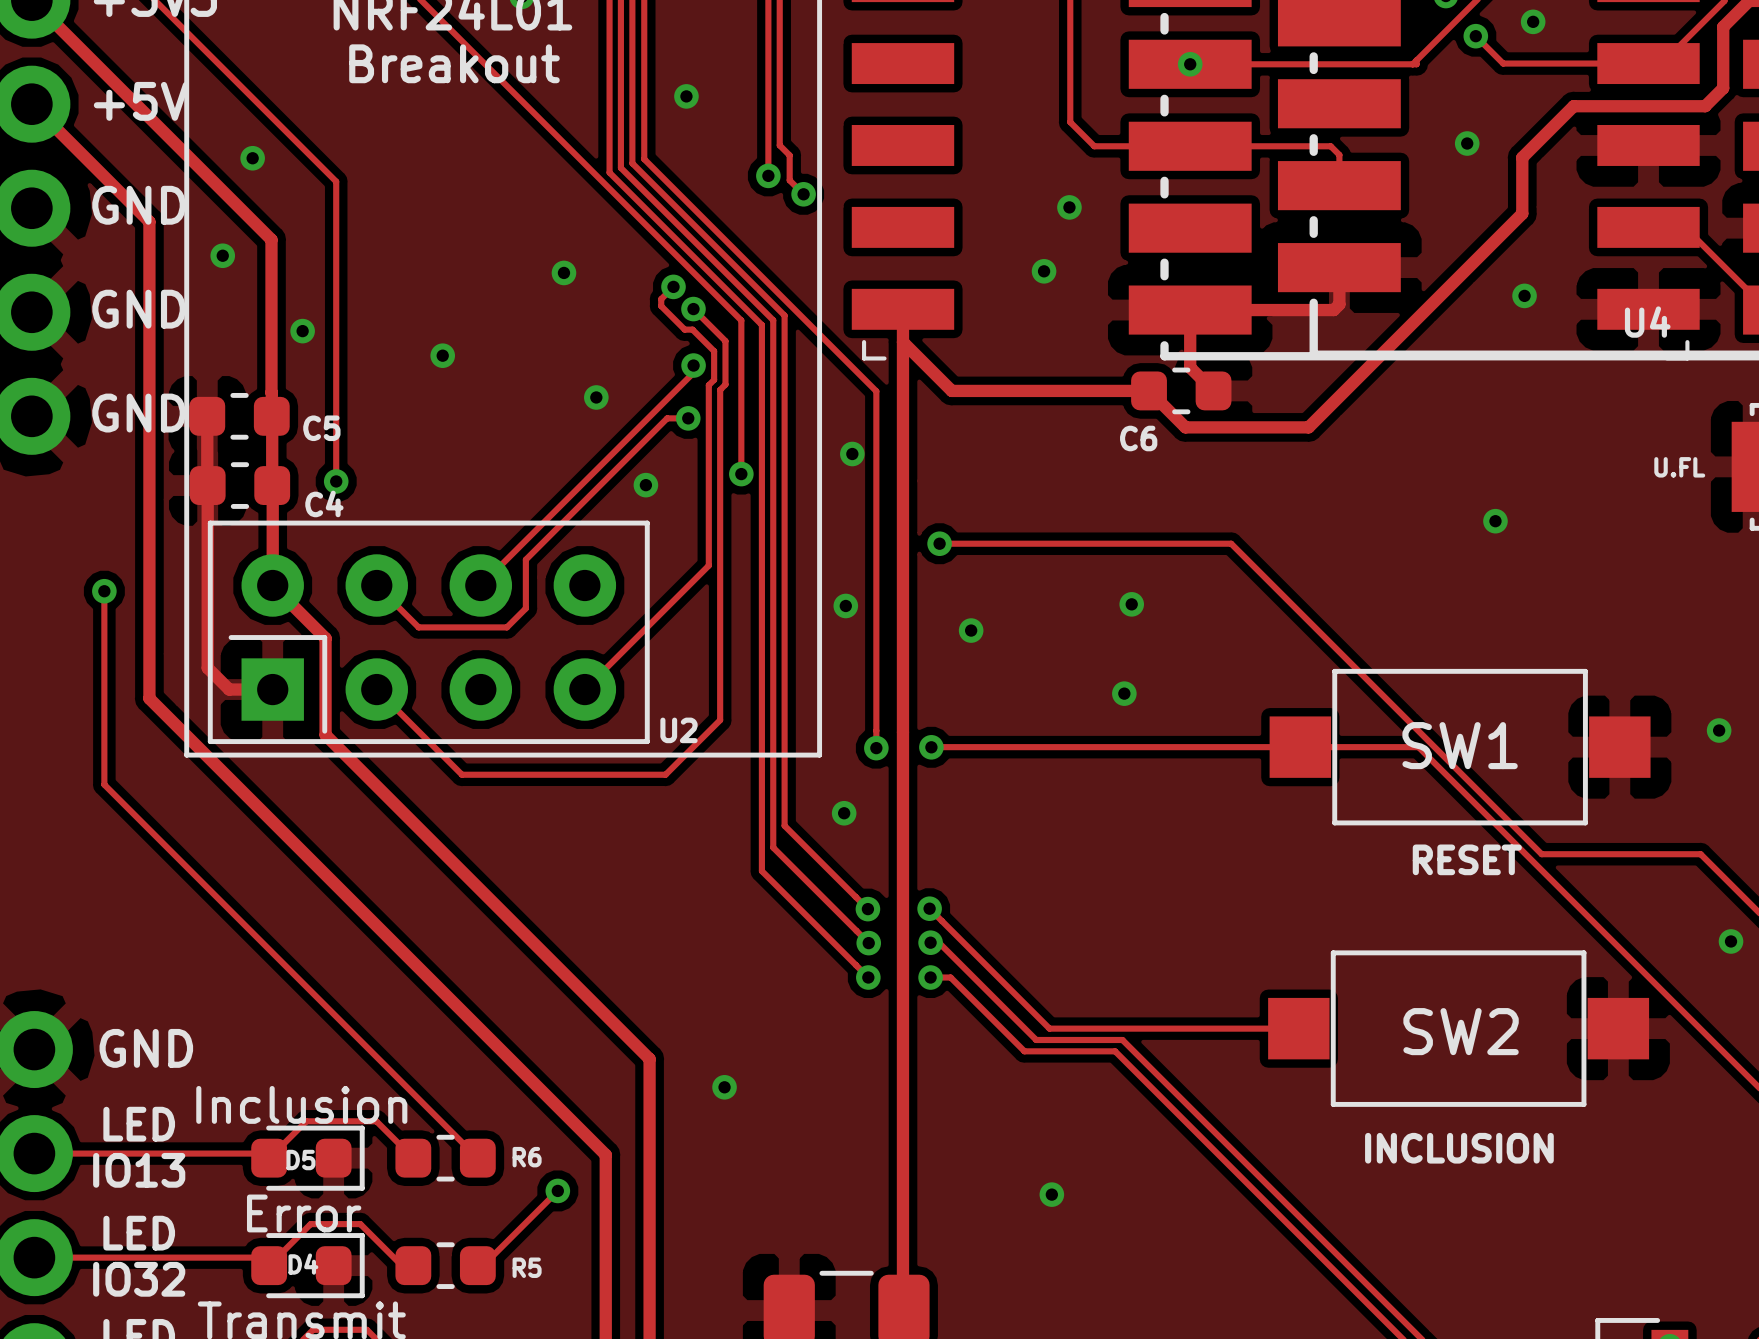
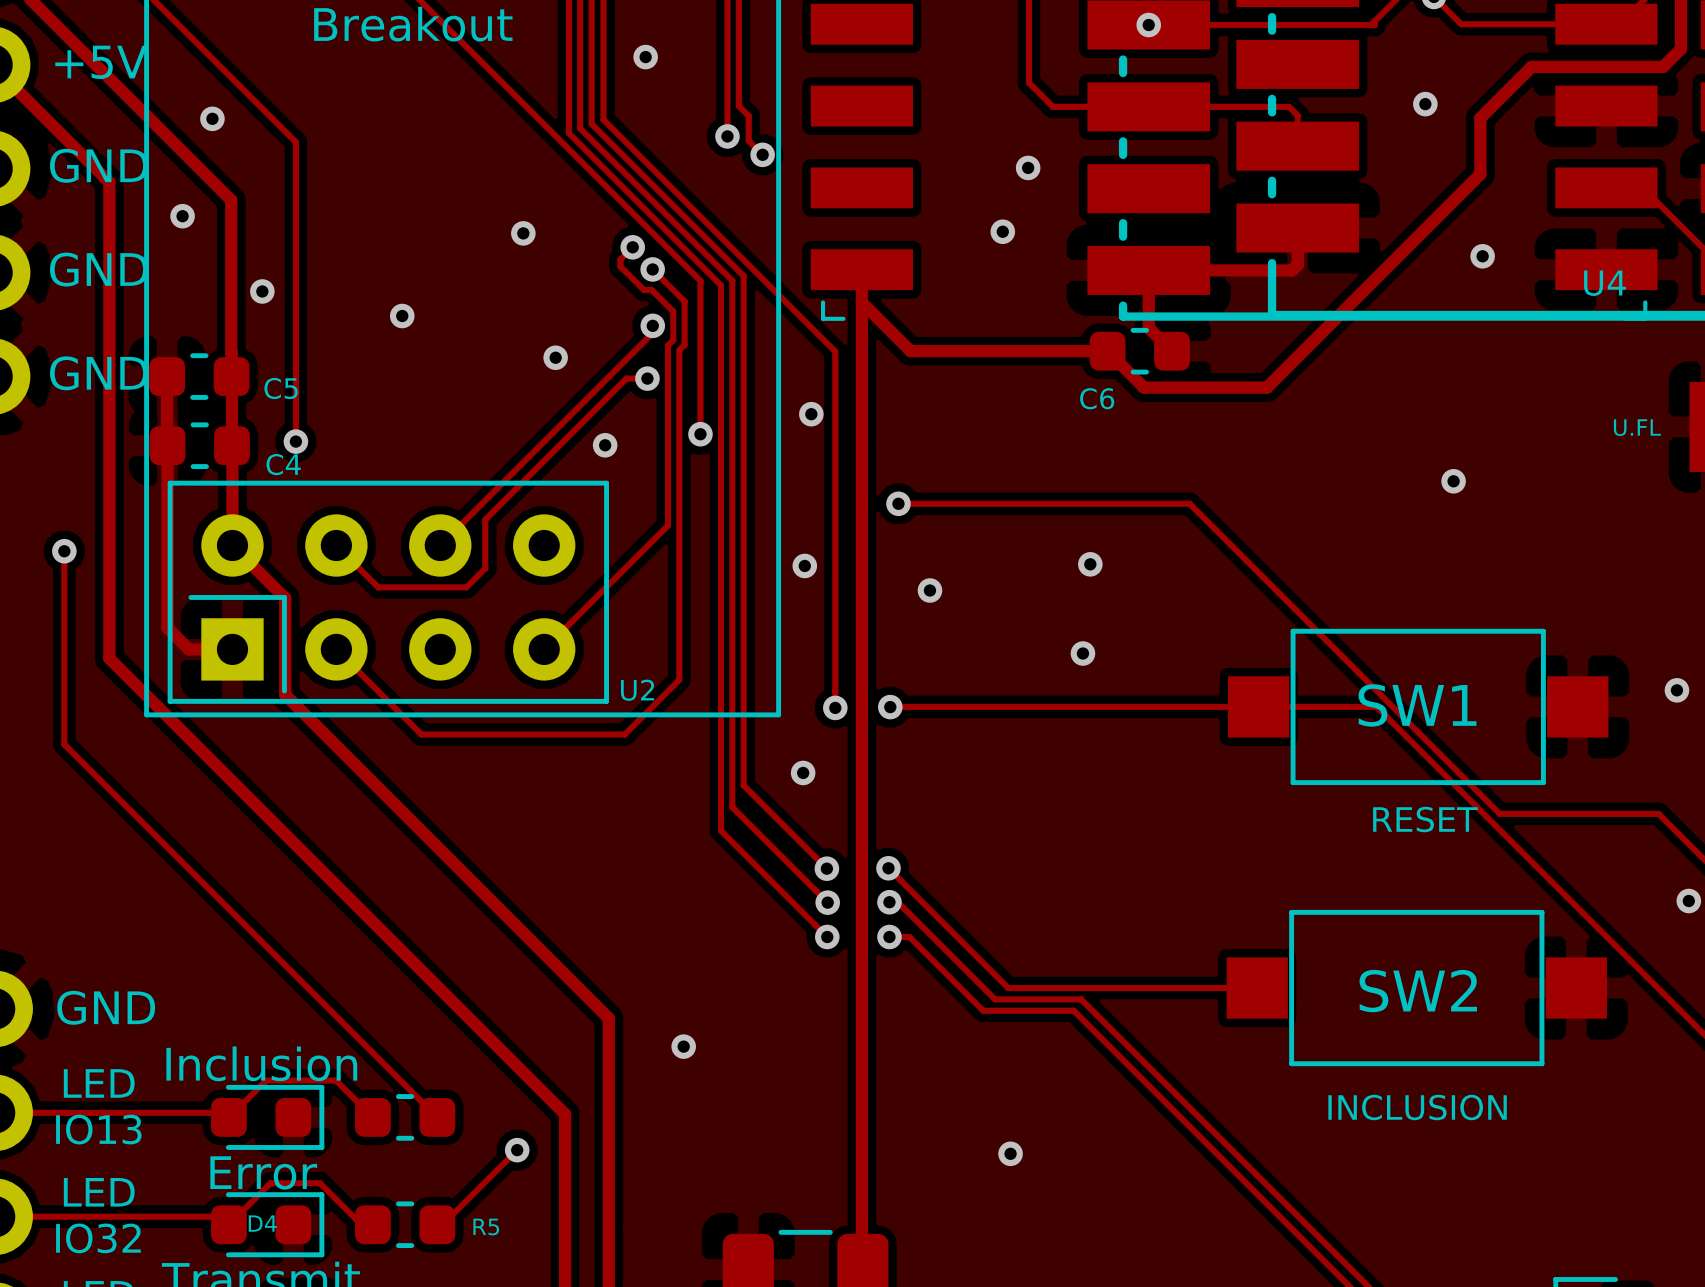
R6 name: R6 (527, 1157) -> none
D5 name: D5 (300, 1160) -> none

